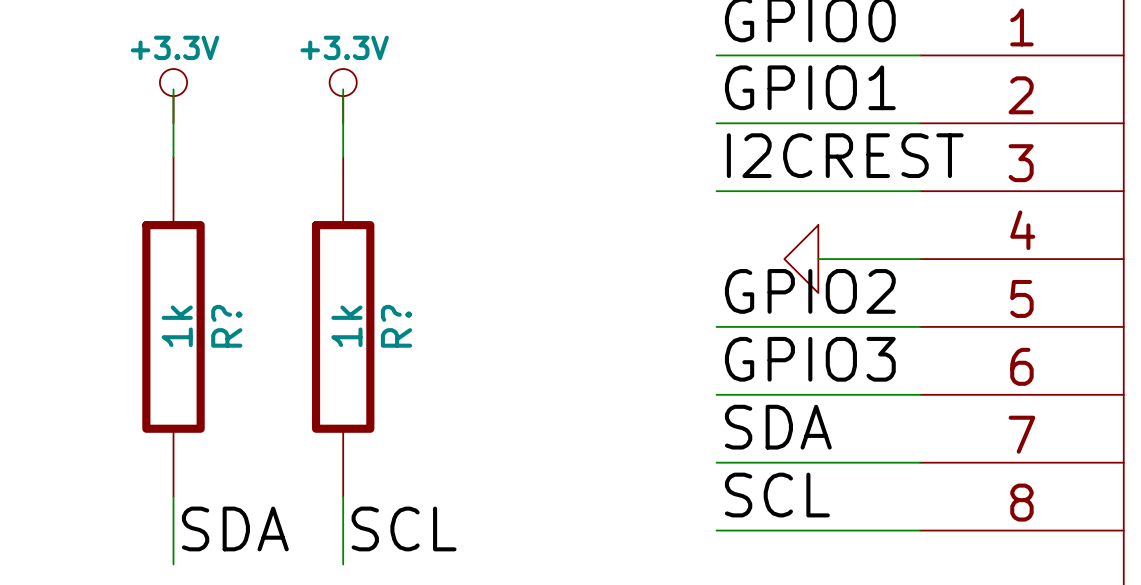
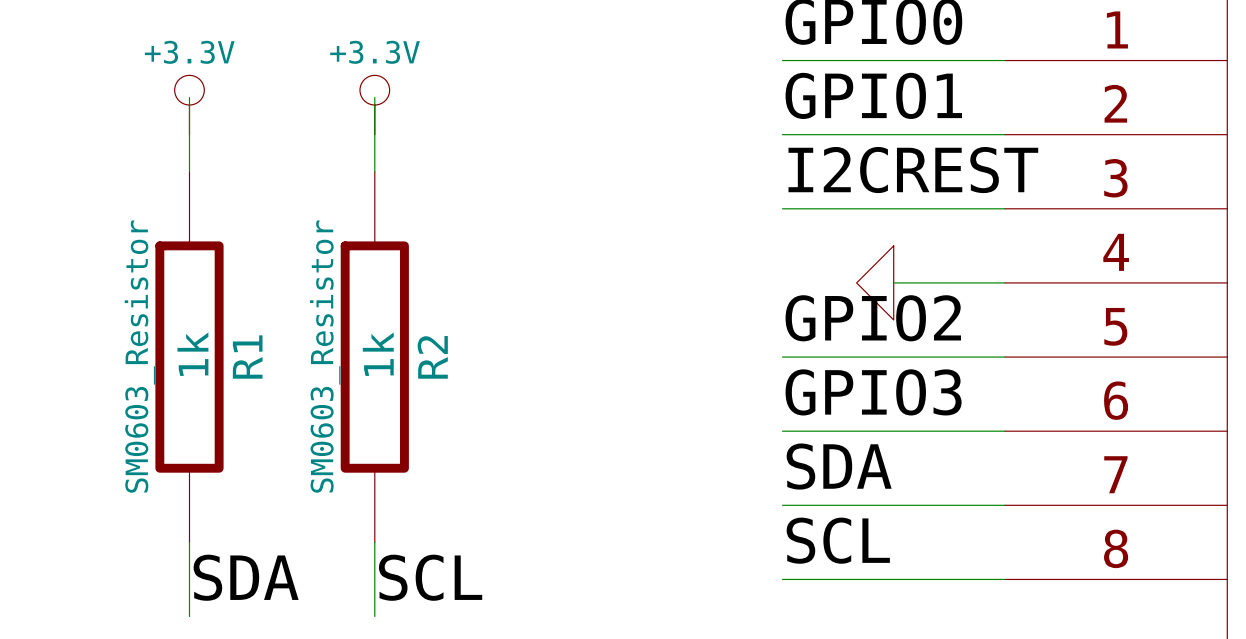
R? text: none -> SM0603_Resistor (139, 356)
R? text: none -> SM0603_Resistor (325, 356)
R? name: R? (226, 326) -> R1 (247, 357)
R? name: R? (396, 326) -> R2 (432, 357)

